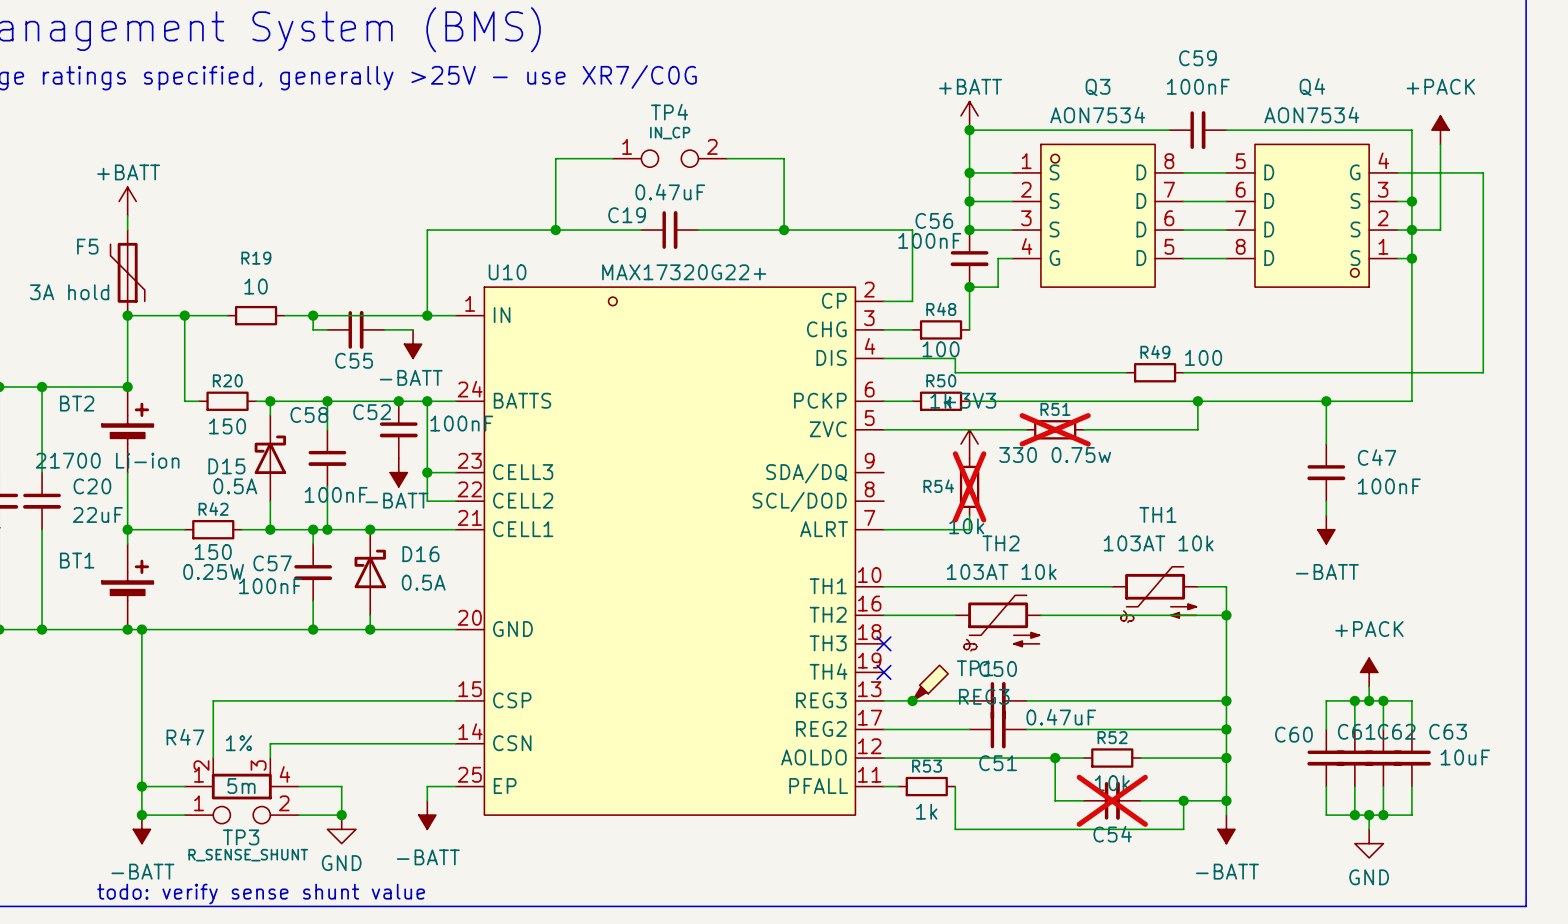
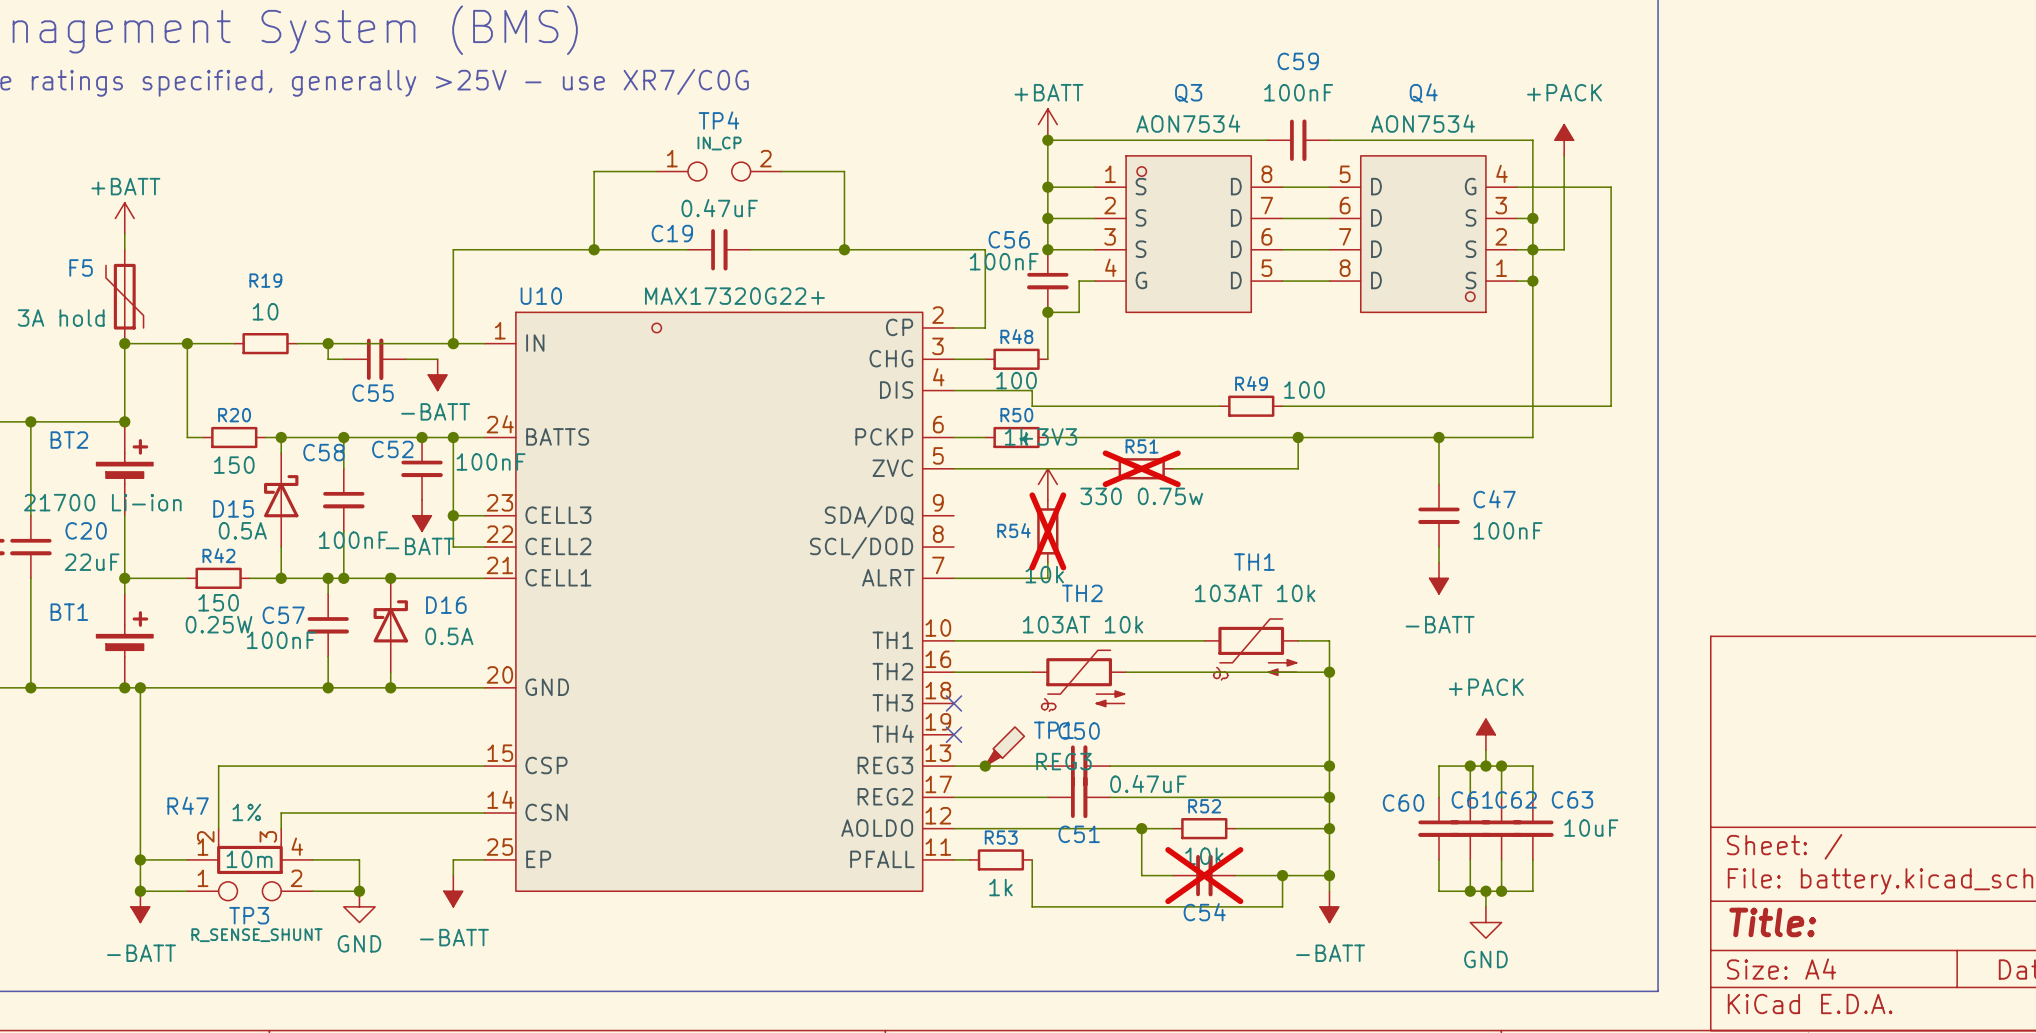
R47 value: 5m (241, 786) -> 10m (249, 859)
text: todo: verify sense shunt value (261, 894) -> none

